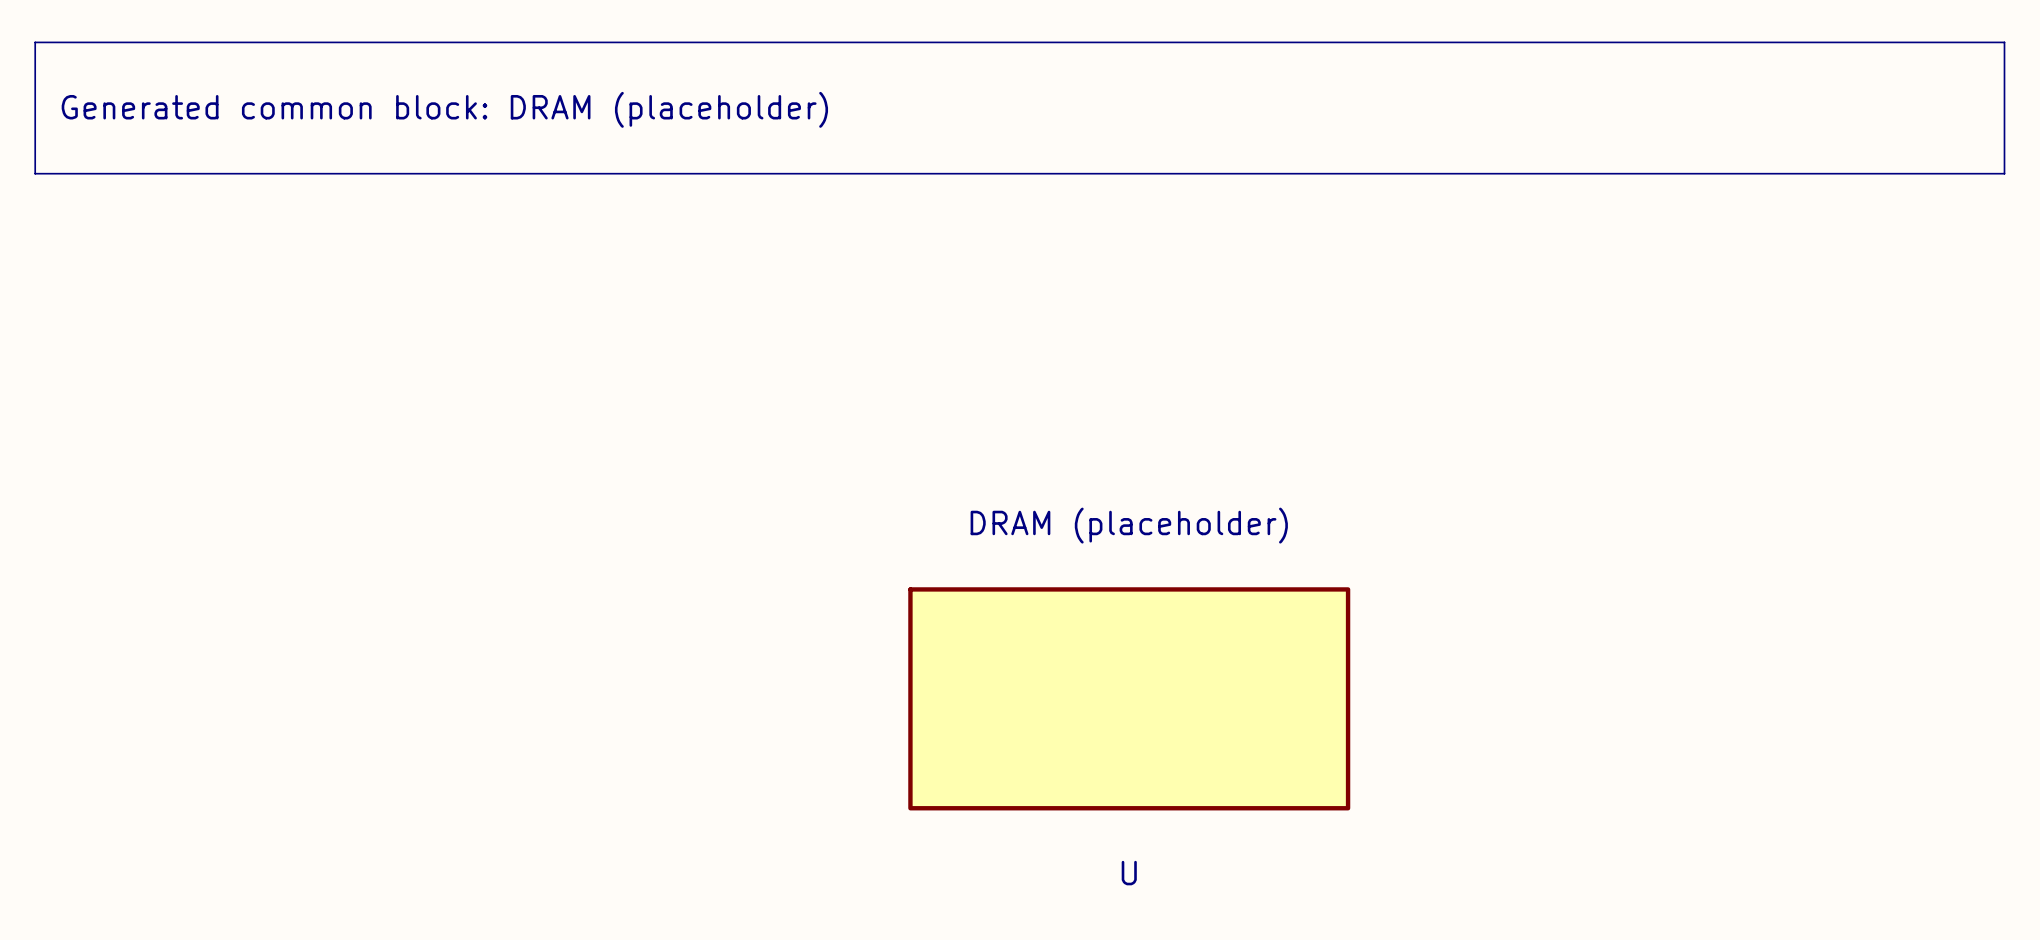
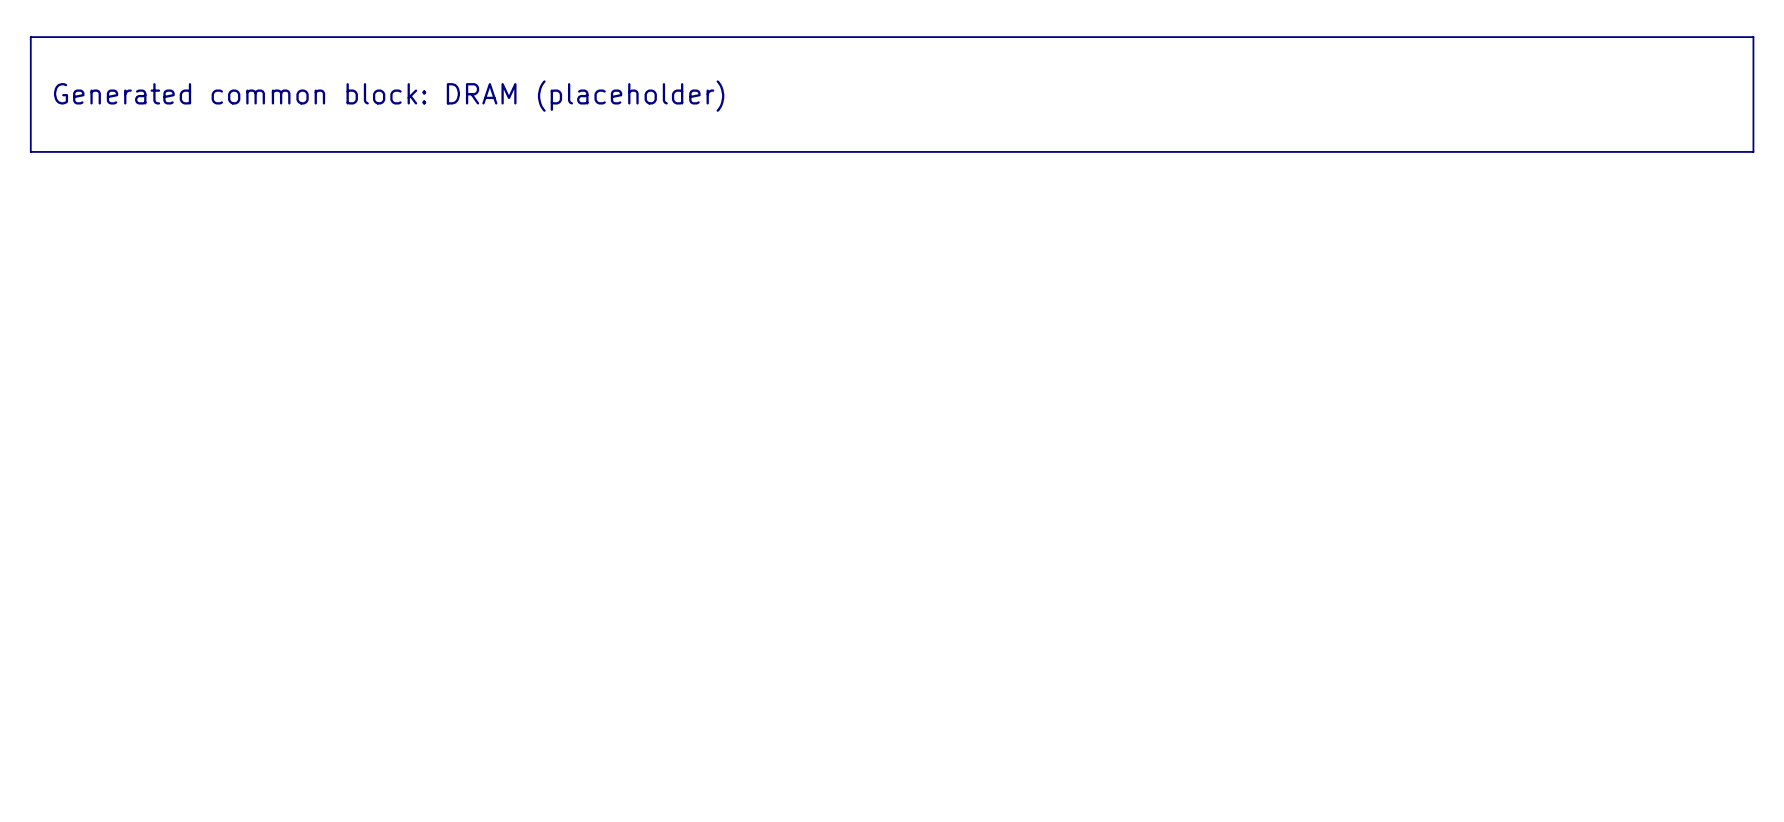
U: DRAM (placeholder) (1129, 698) -> none

